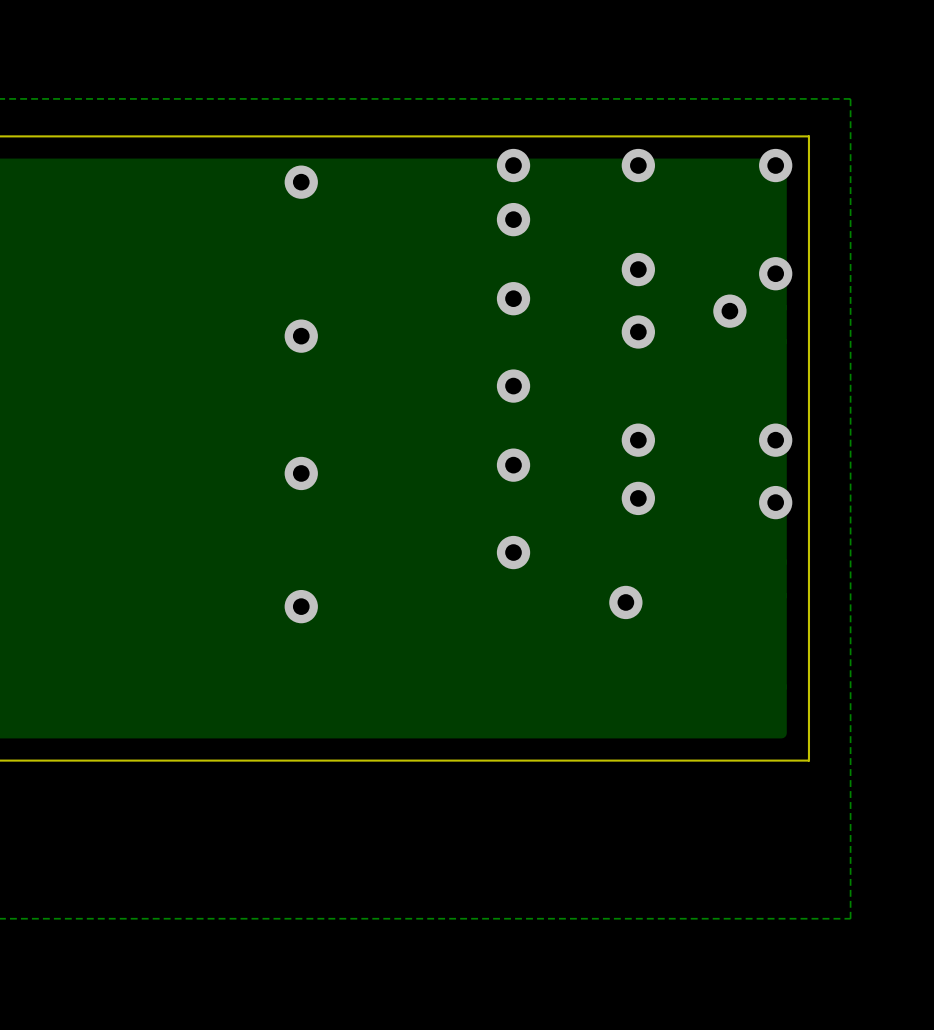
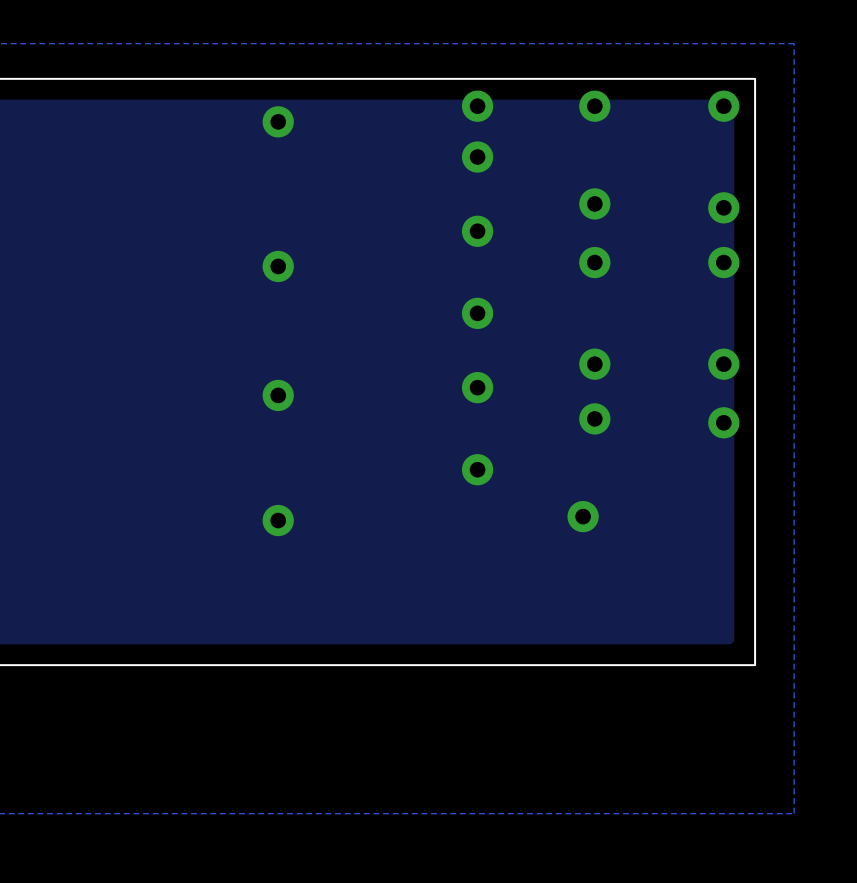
via position: (729, 311) -> (723, 262)

